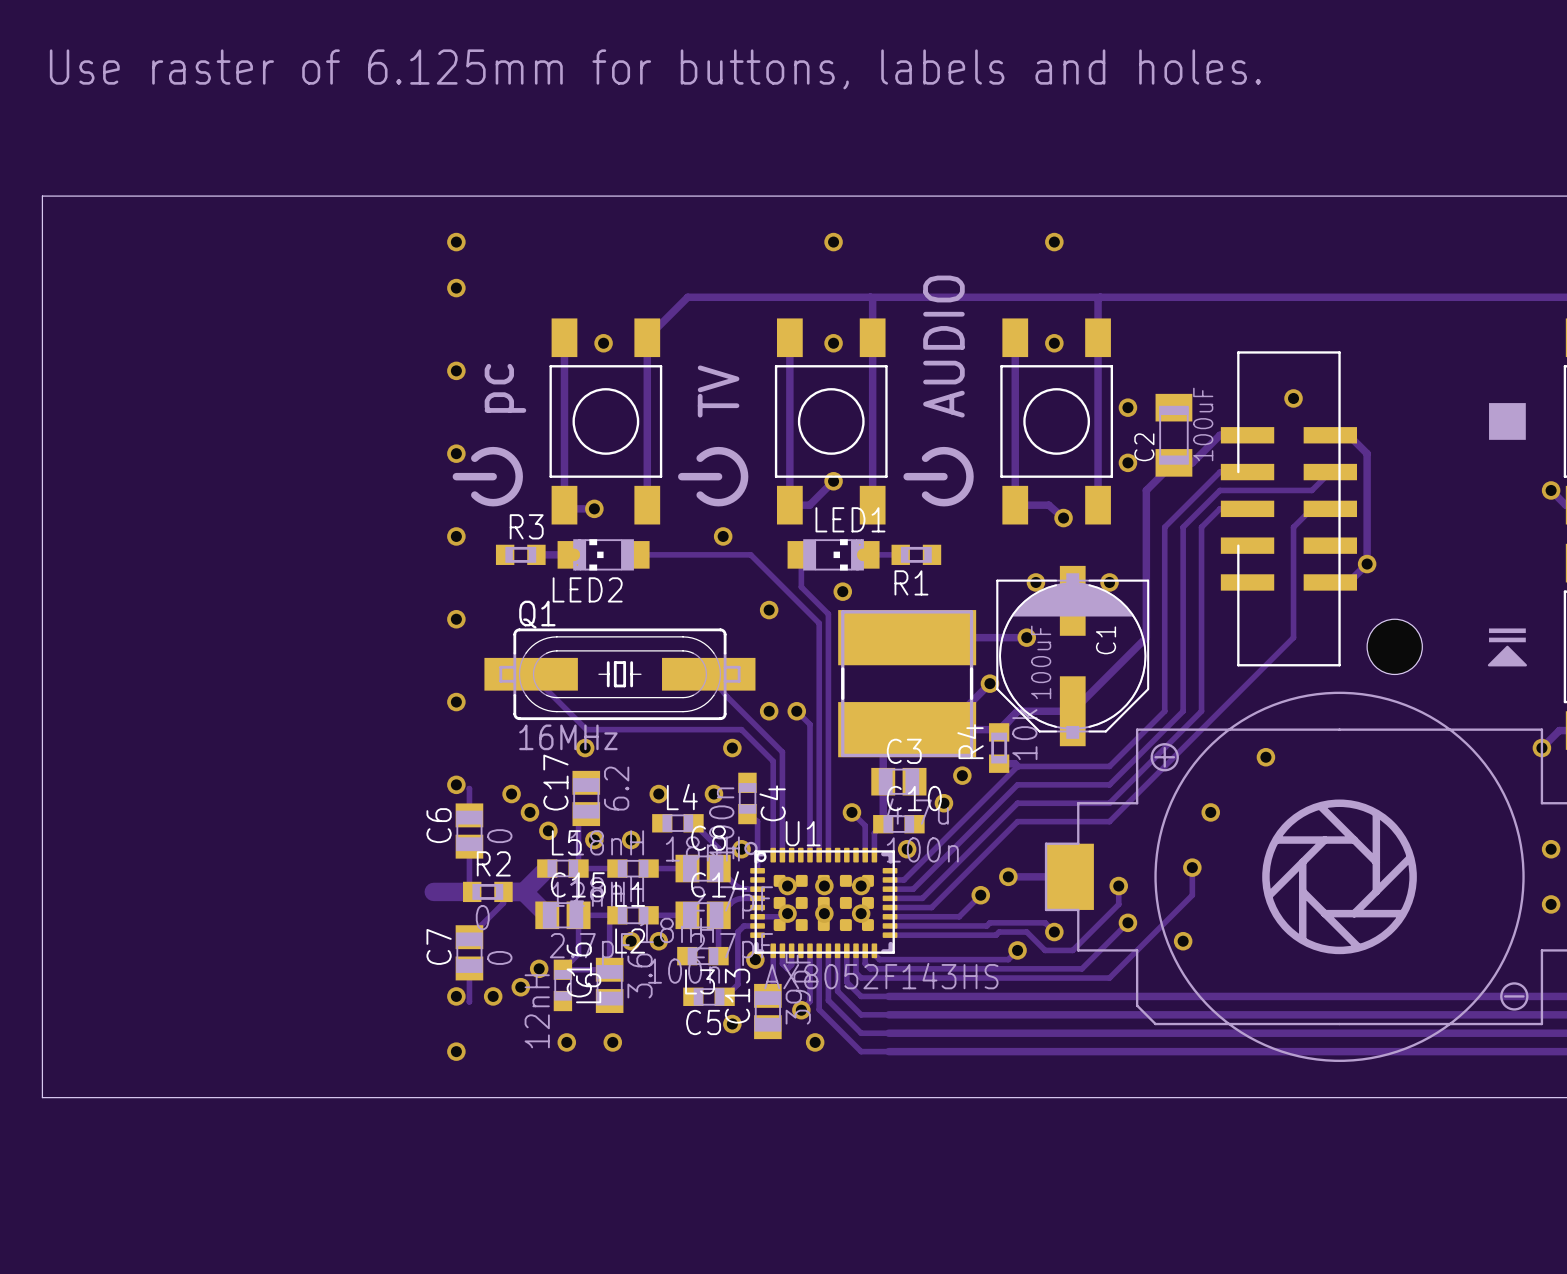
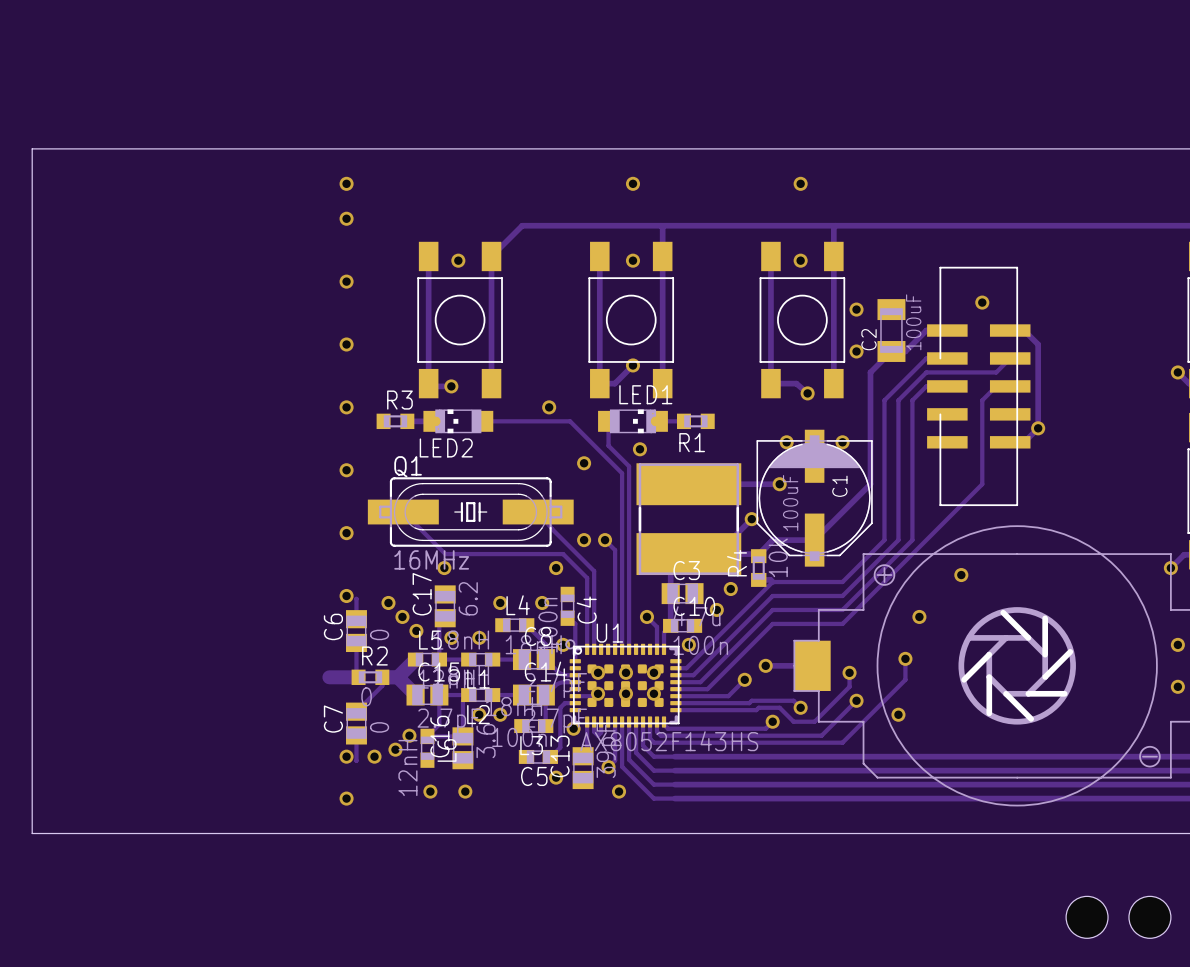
text: Use raster of 6.125mm for buttons, labels and holes. (655, 69) -> none
drawing: [1489, 403, 1526, 440] -> none
drawing: [452, 446, 523, 507] -> none
drawing: [678, 446, 749, 507] -> none
drawing: [903, 446, 974, 507] -> none
drawing: [1487, 628, 1527, 667] -> none
hole: (1394, 646) -> none
drawing shape: [1262, 799, 1417, 955] -> [958, 607, 1076, 725]
hole: none -> (1087, 917)
hole: none -> (1149, 917)

